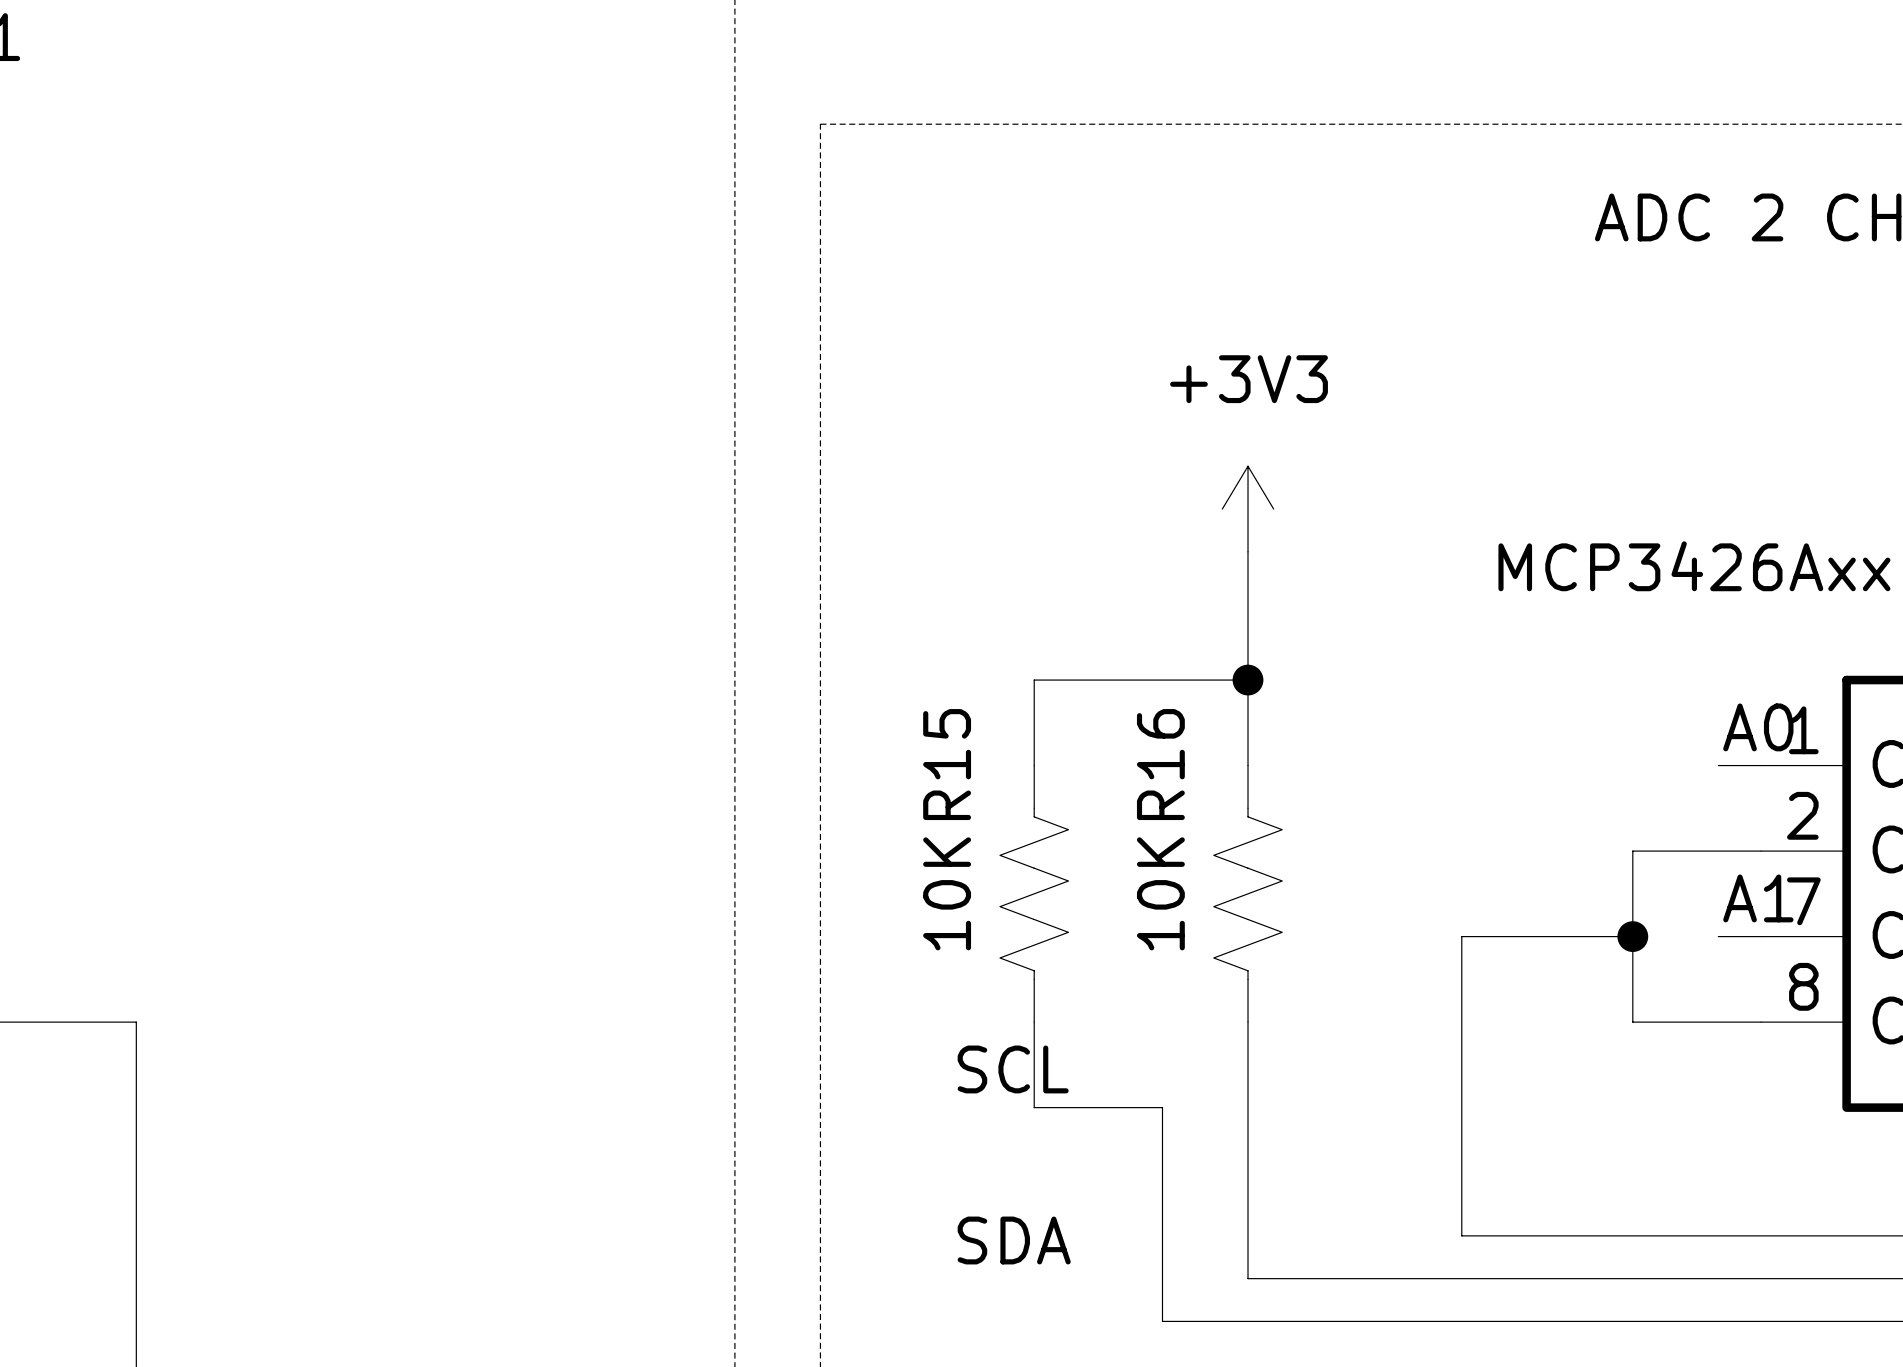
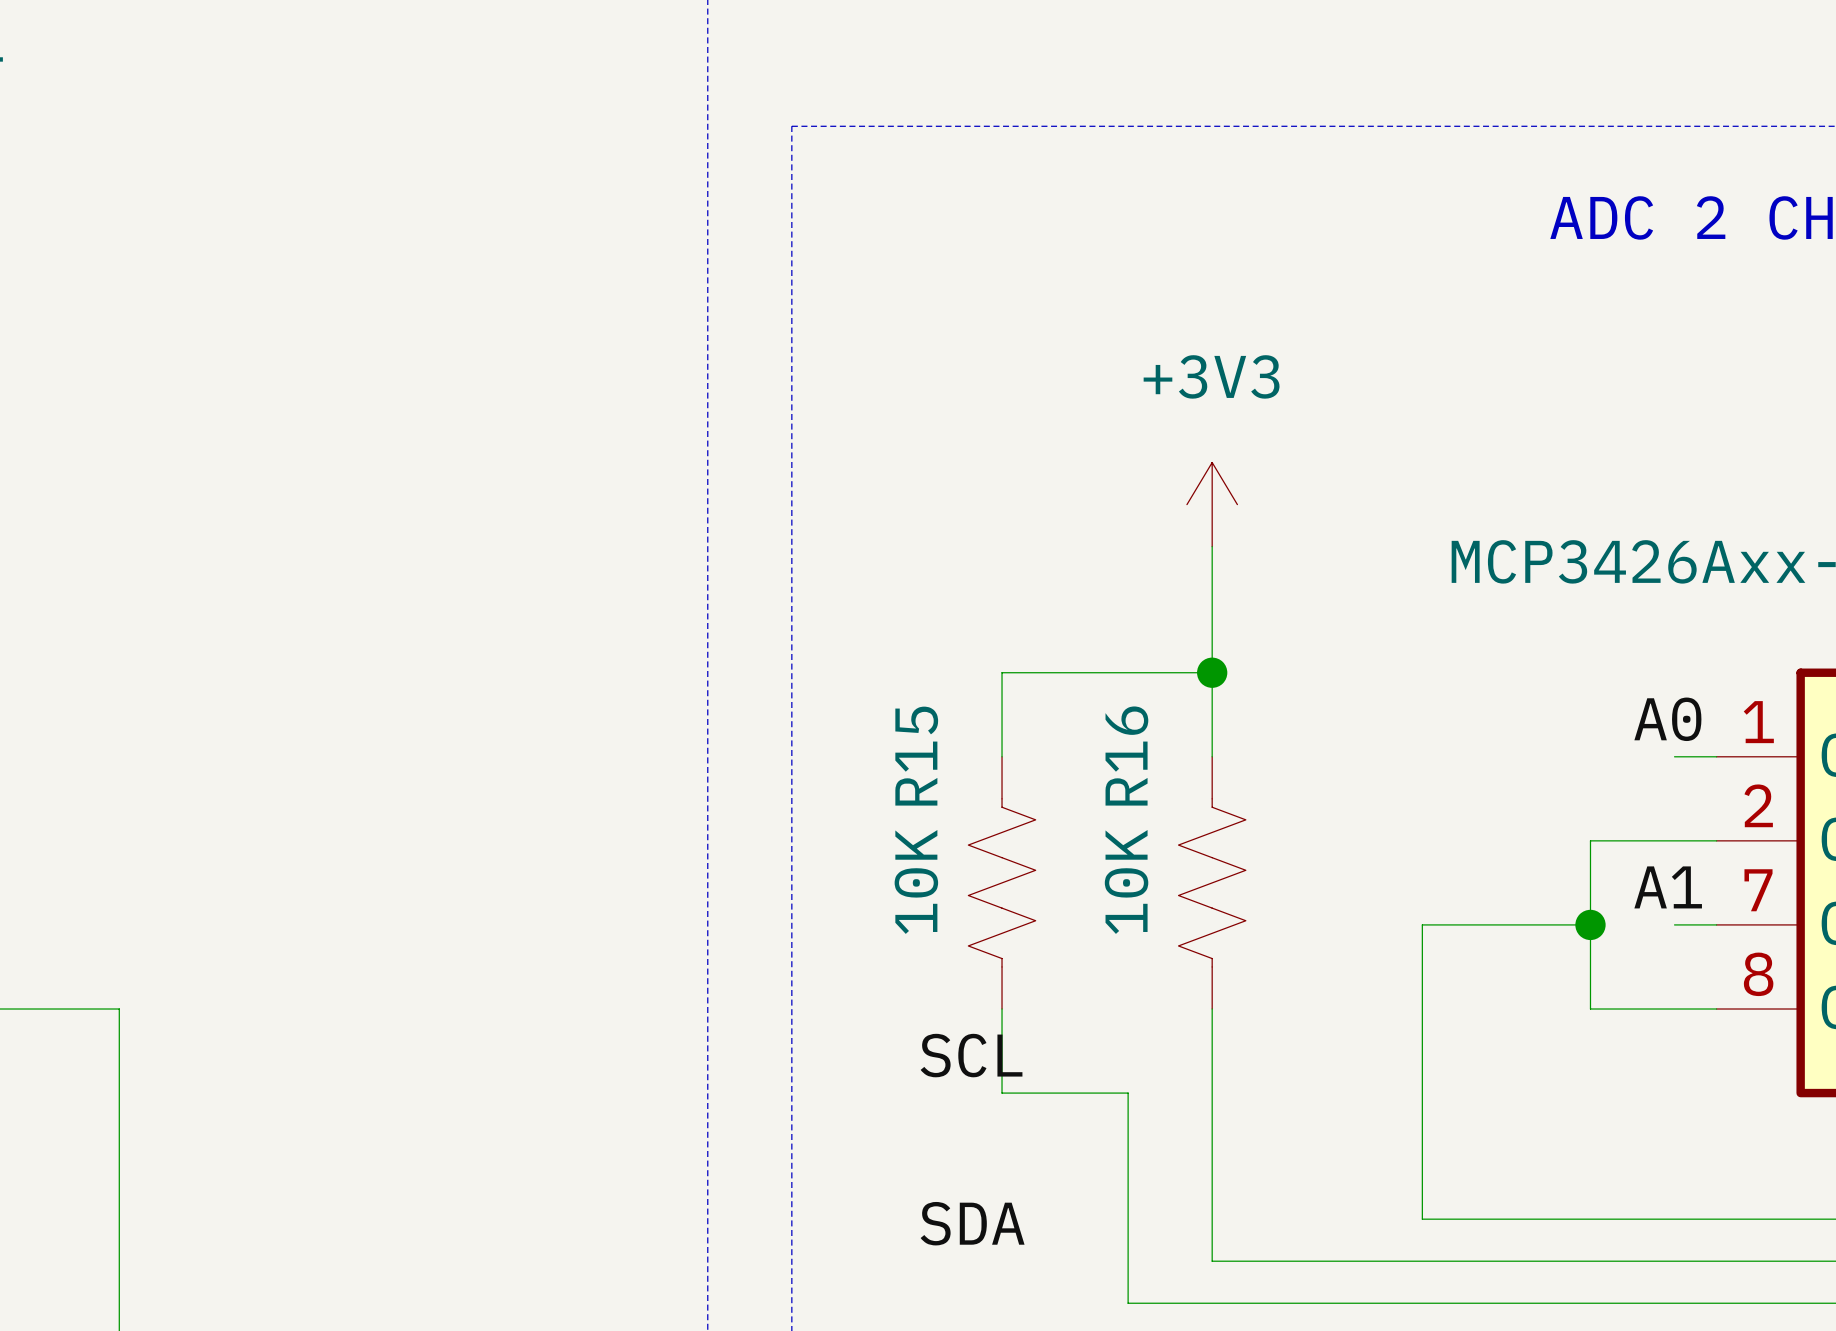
label position: A0 (1758, 727) -> A0 (1667, 719)
label position: A1 (1758, 898) -> A1 (1668, 887)

